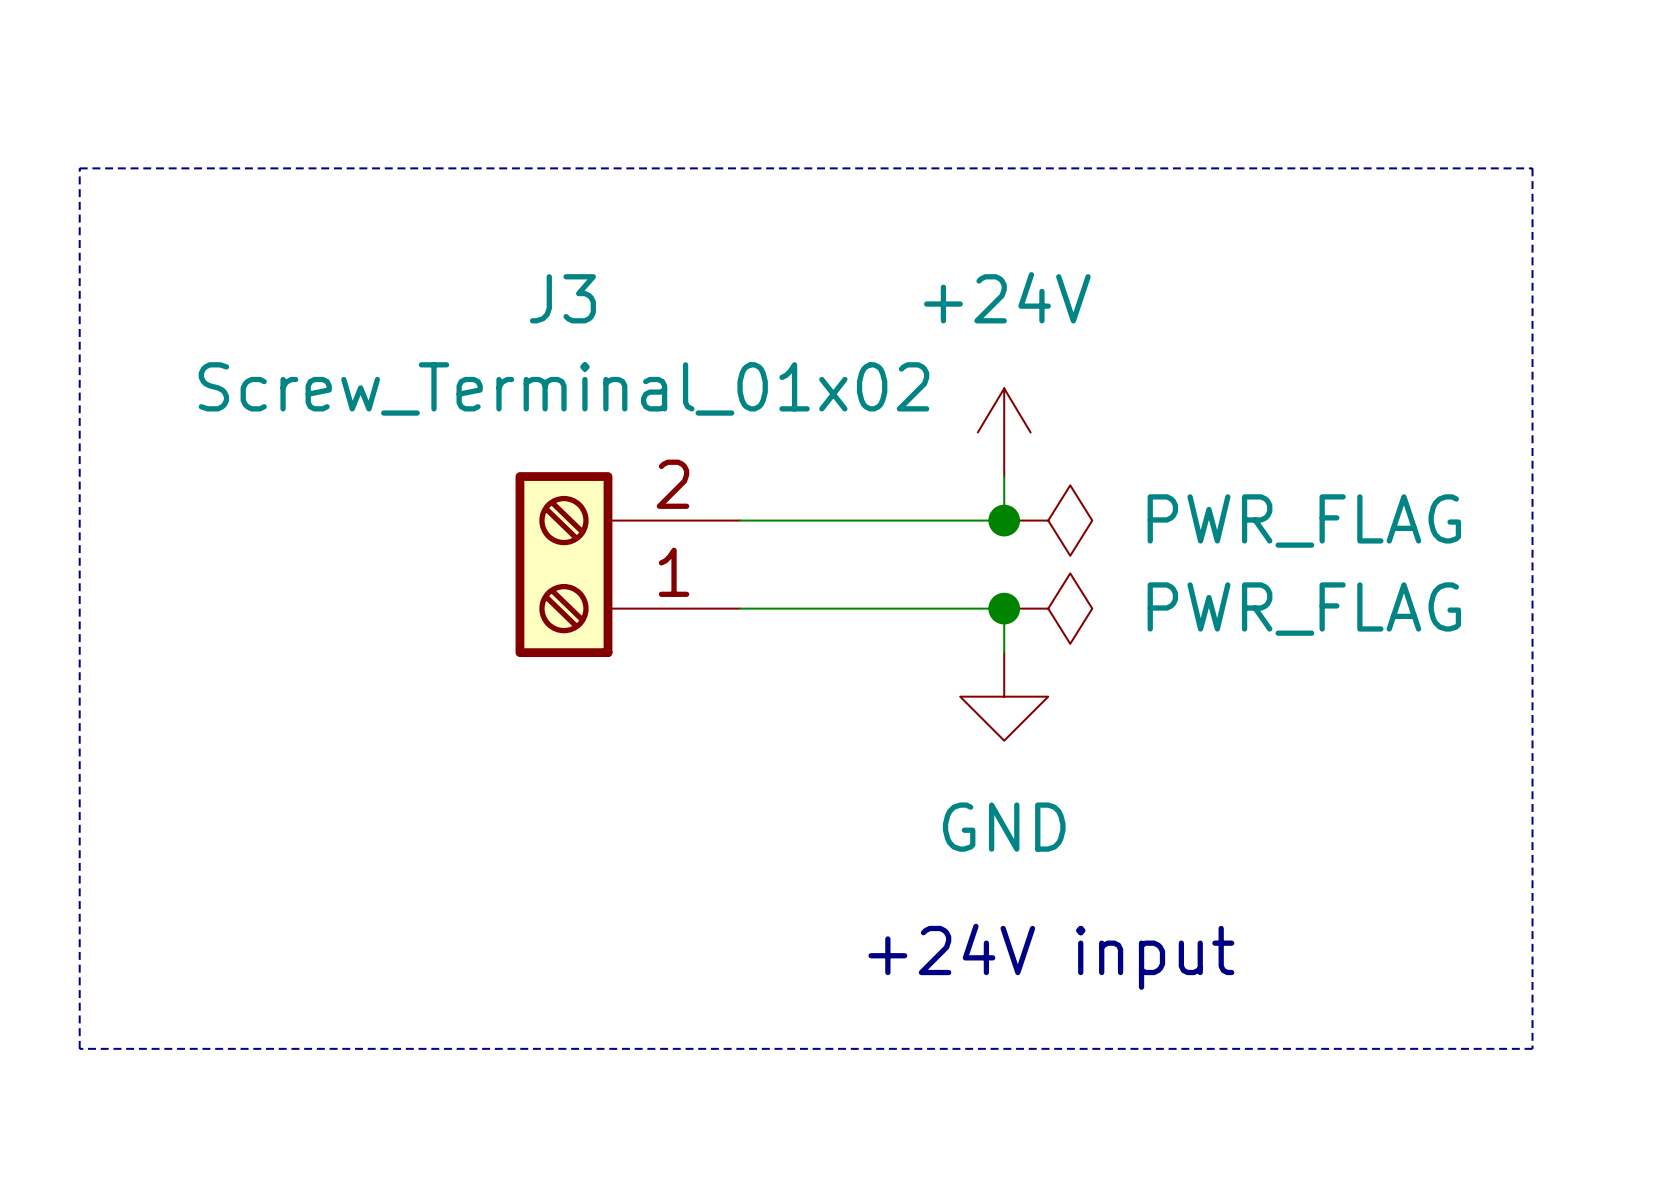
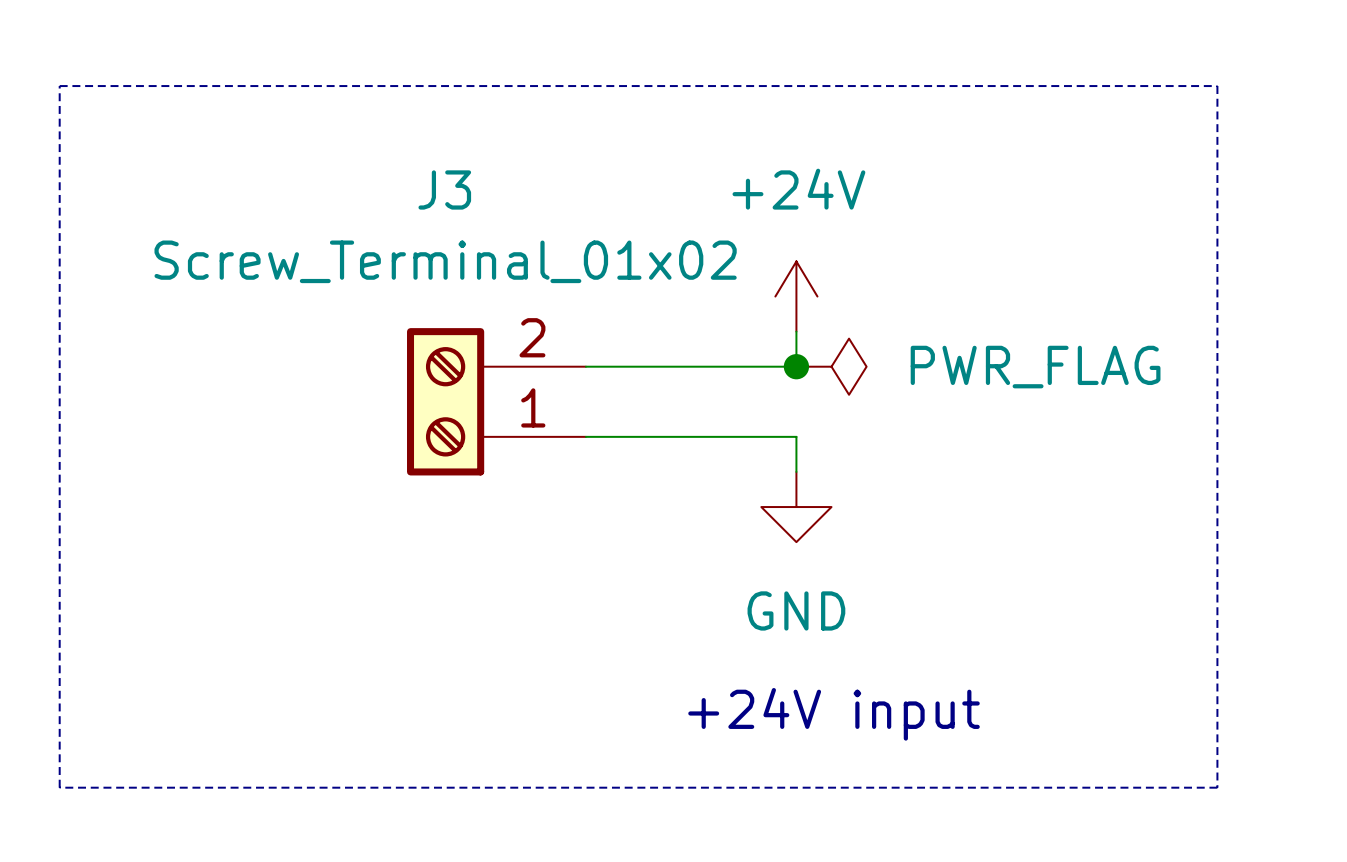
junction: (1004, 608) -> none
power symbol: PWR_FLAG (1048, 608) -> none

